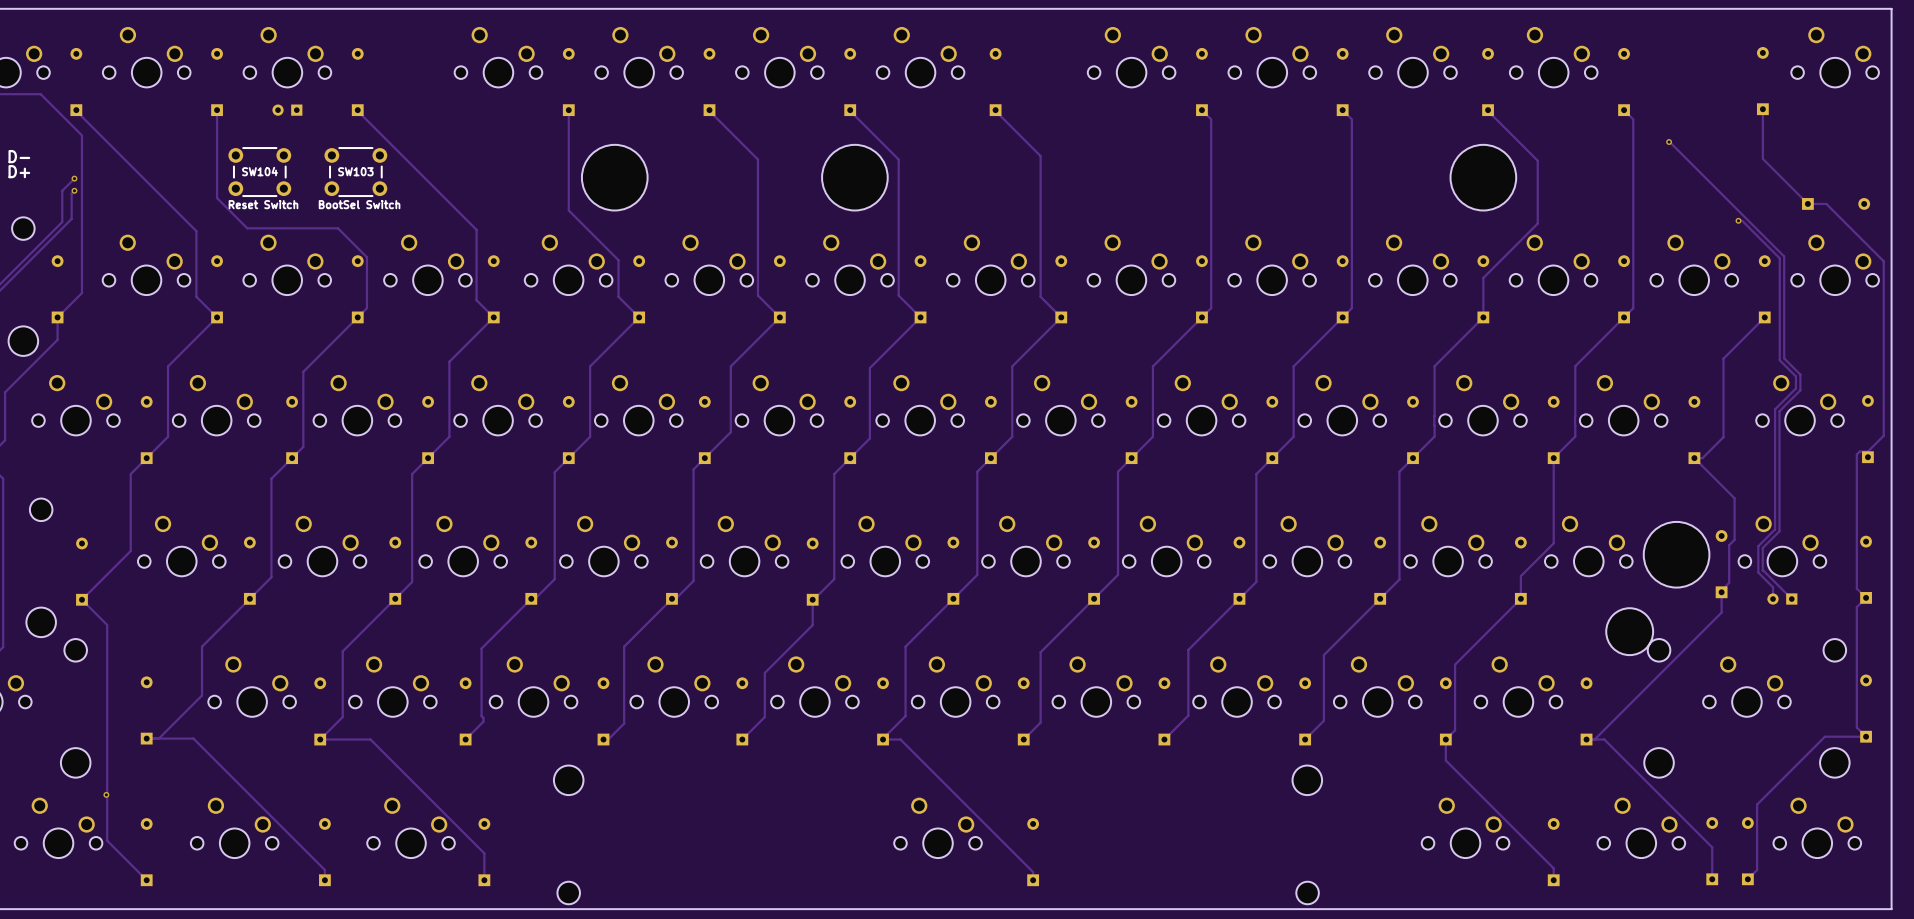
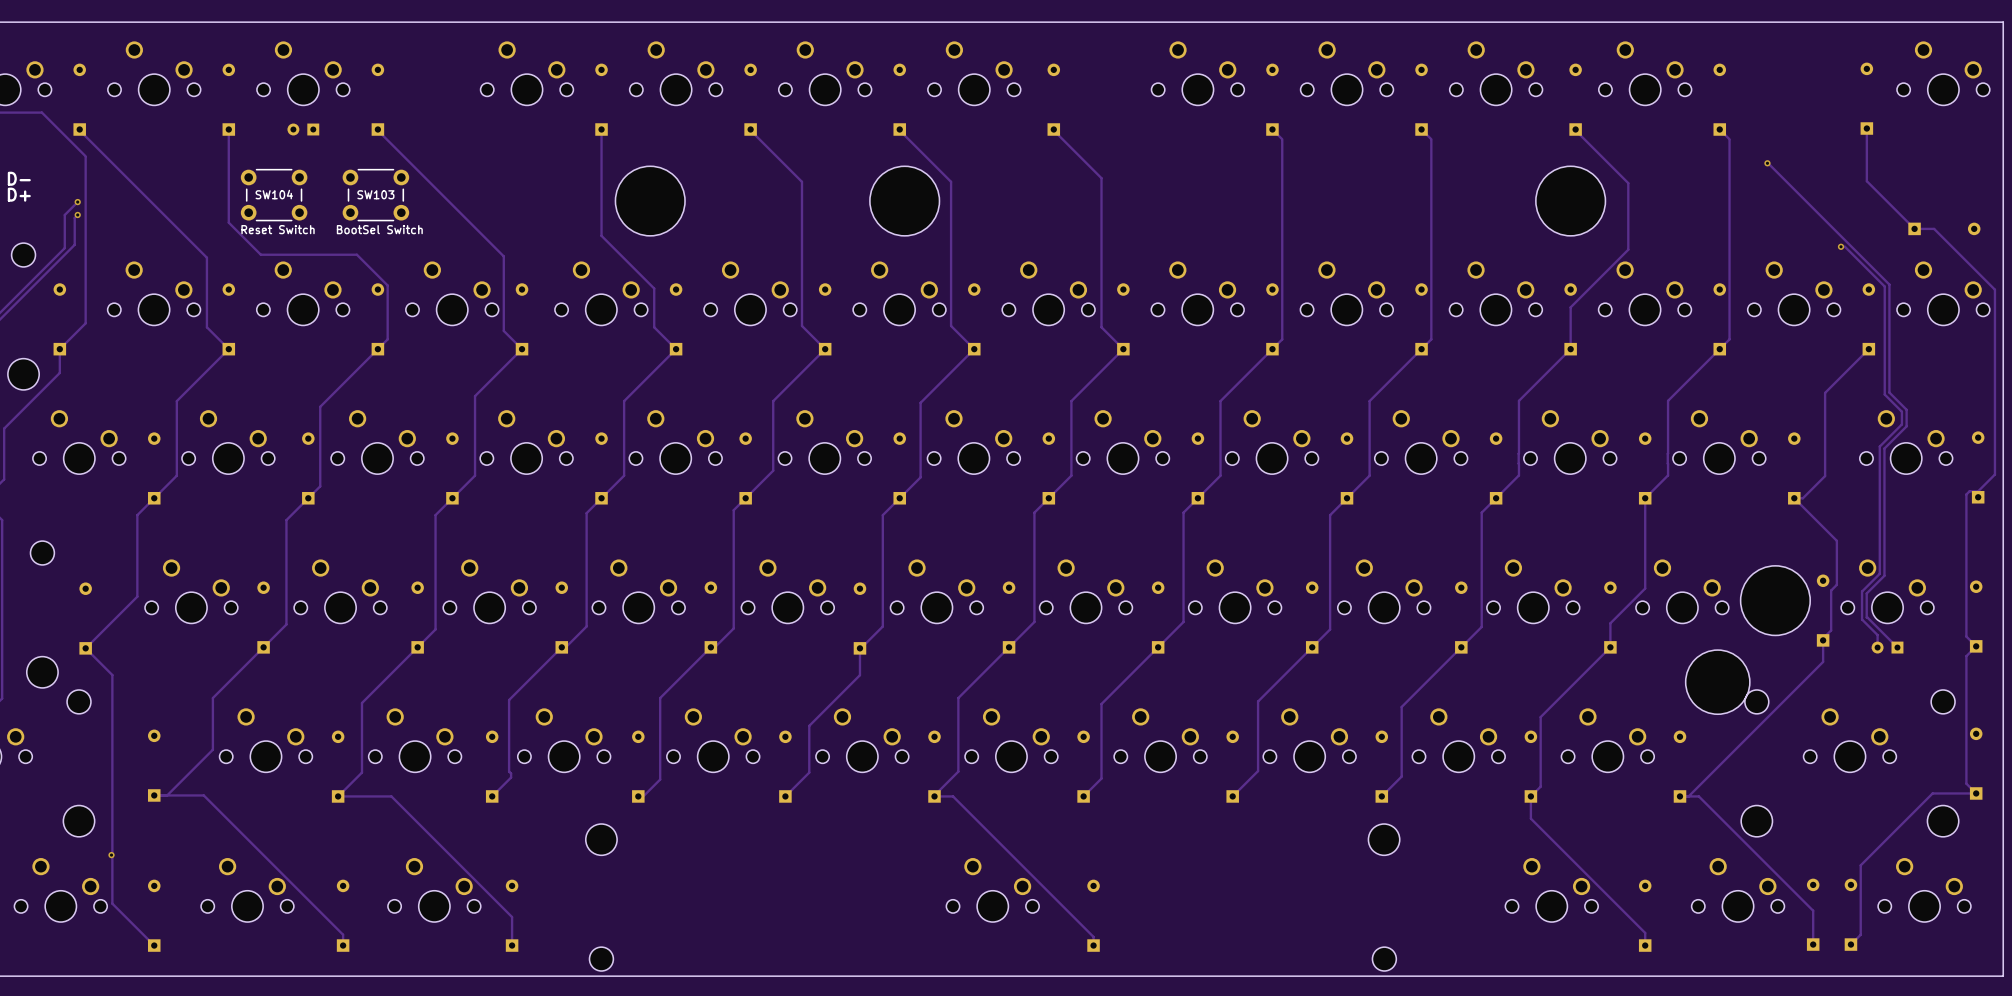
part: none -> (1717, 682)
part: (1629, 631) -> none

